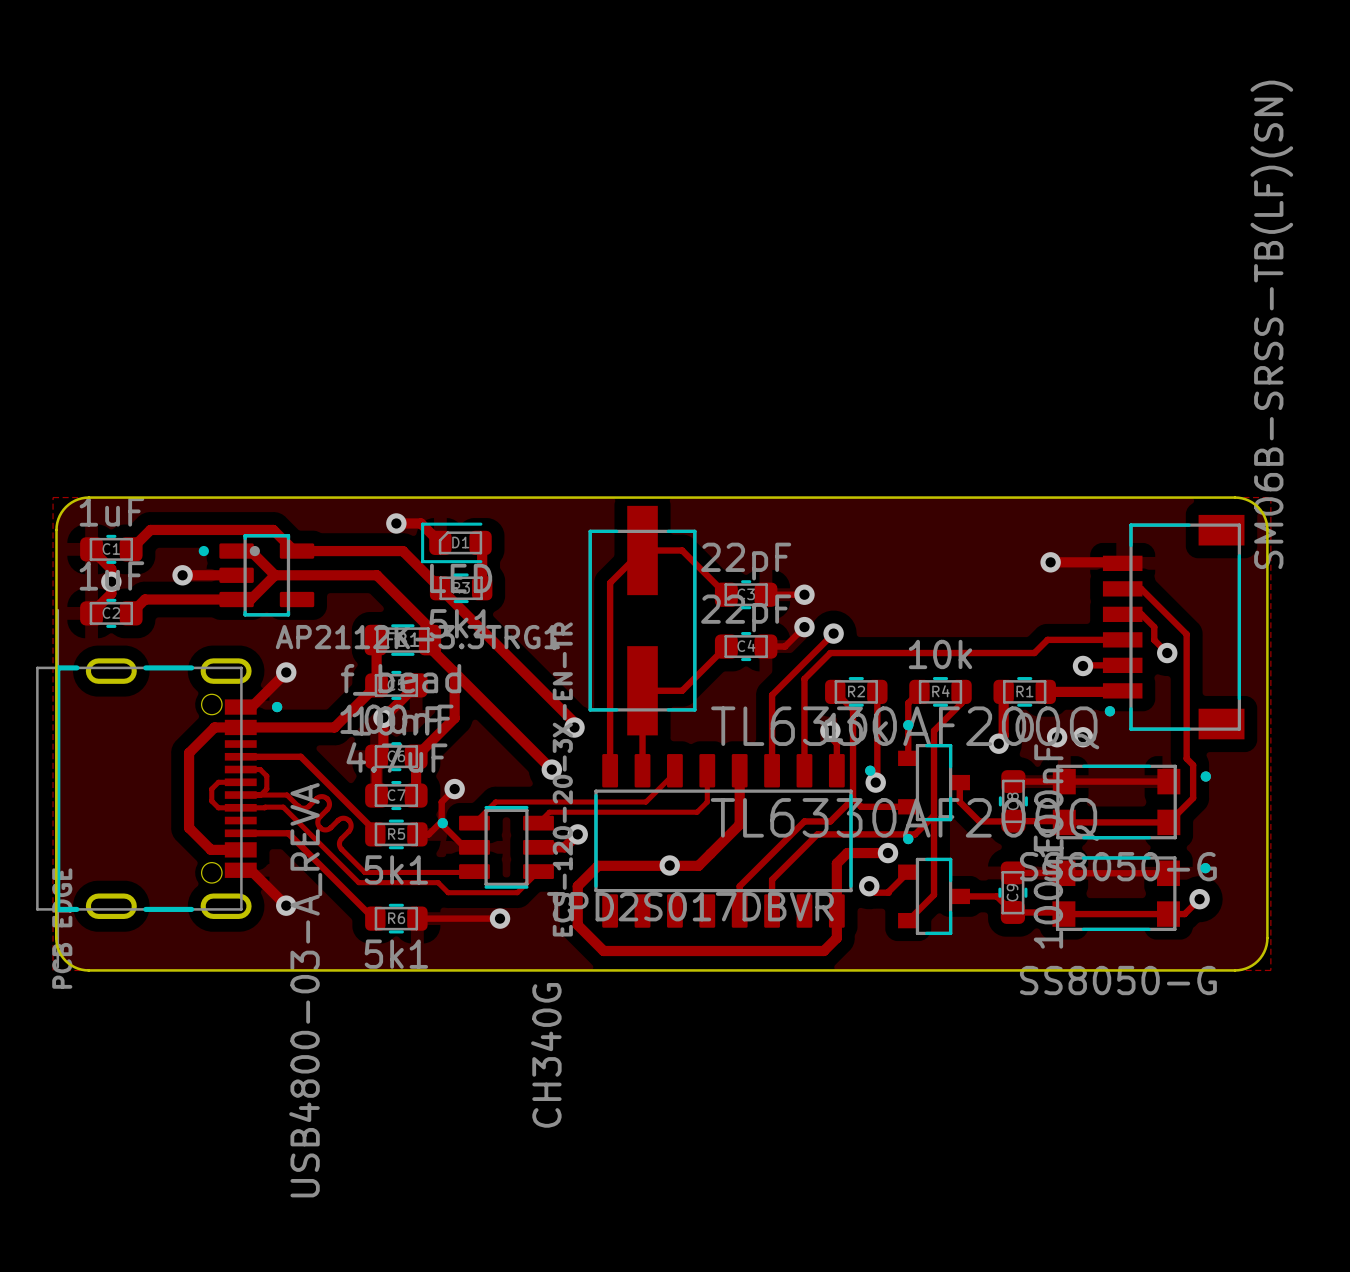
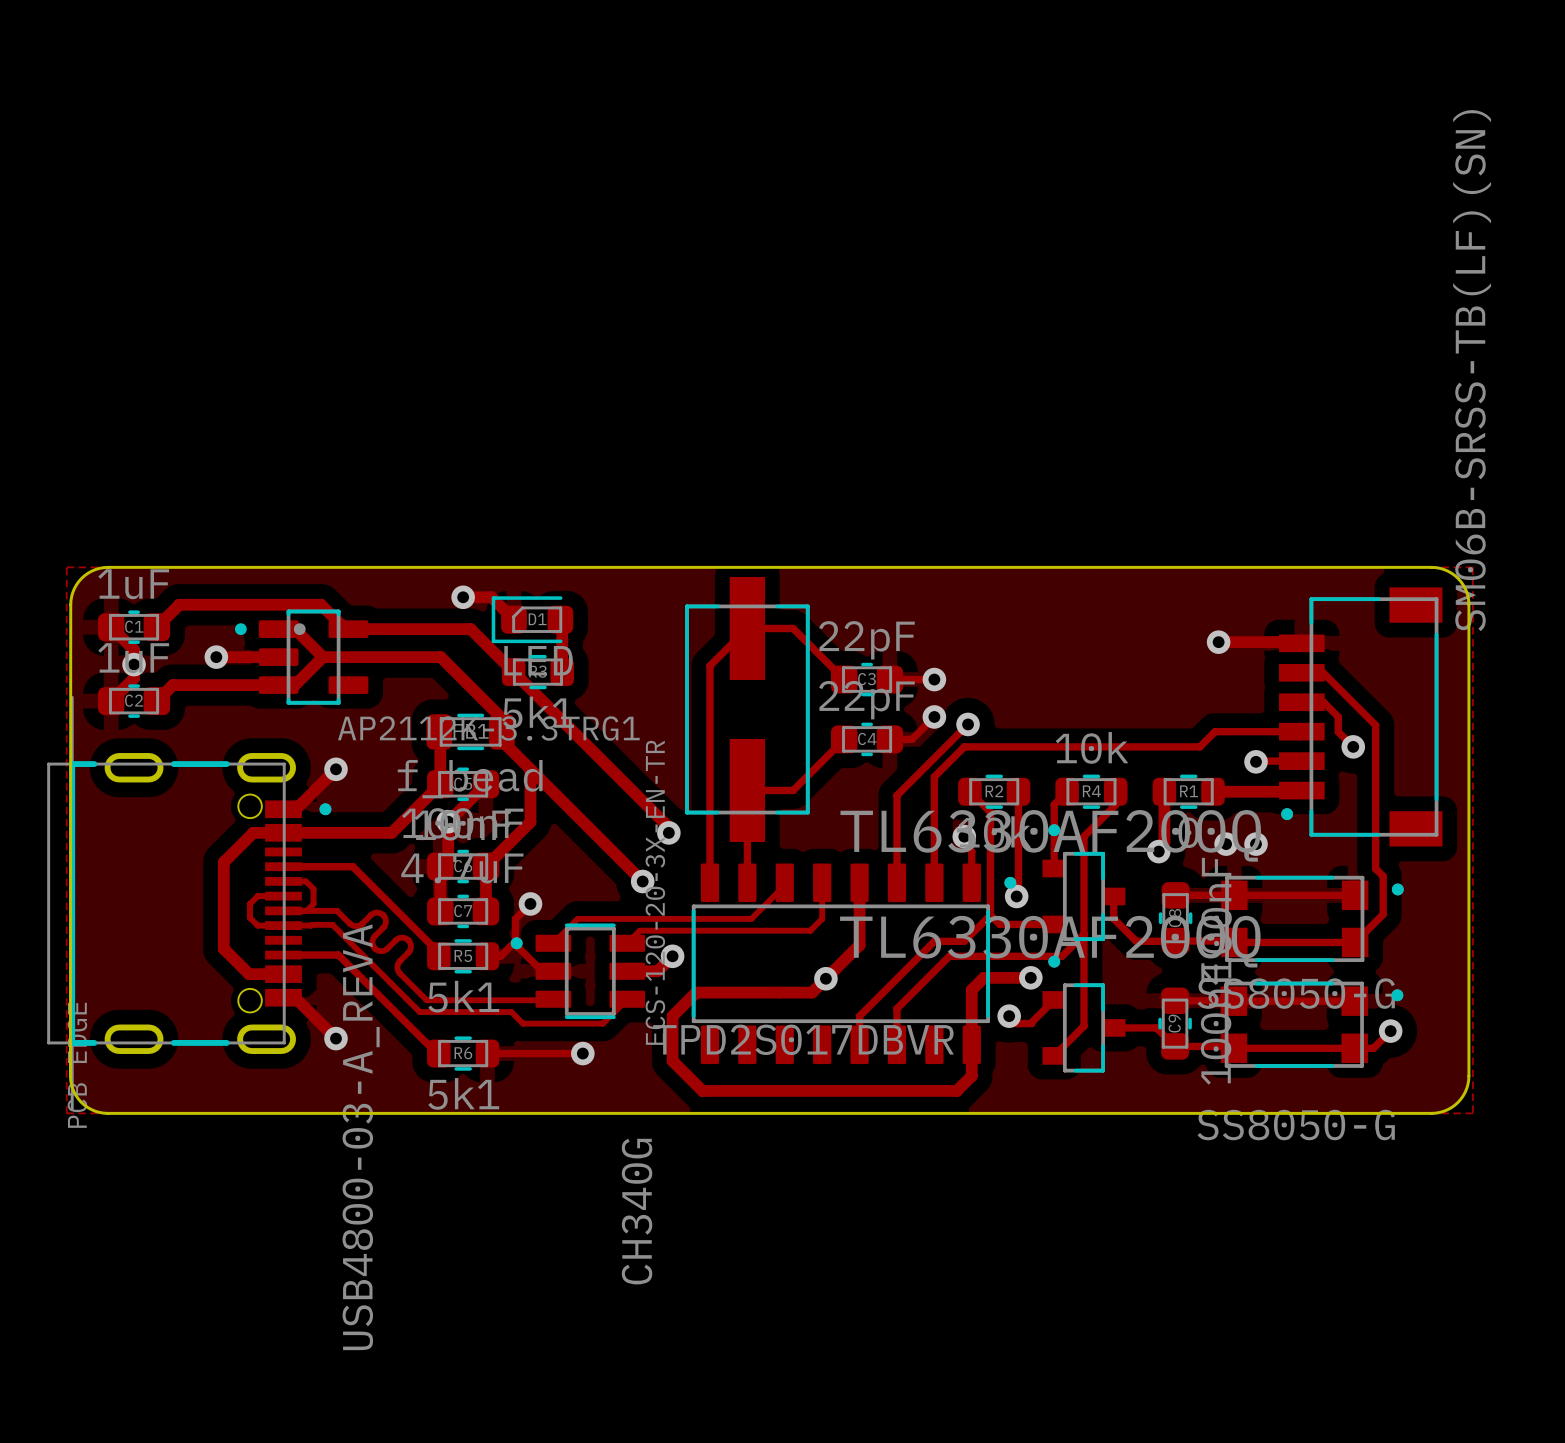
via position: (669, 865) -> (825, 978)

